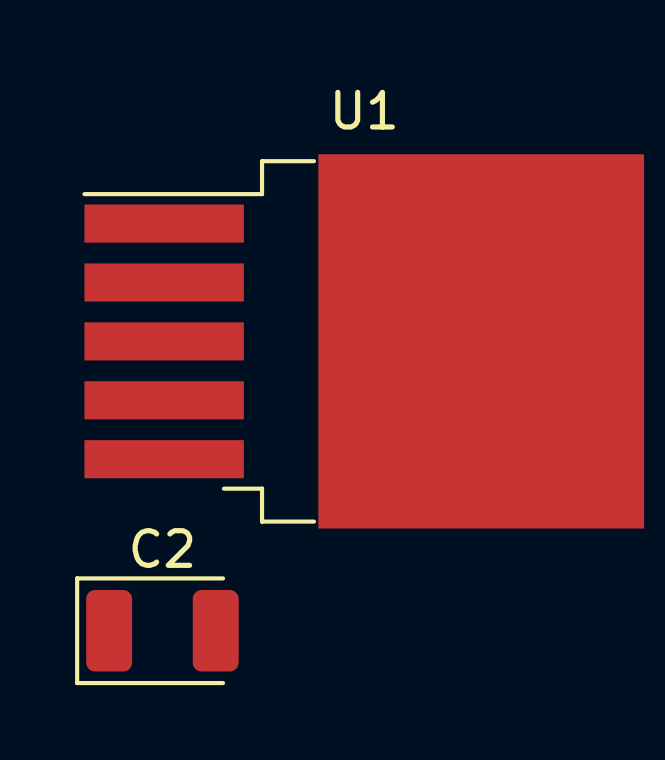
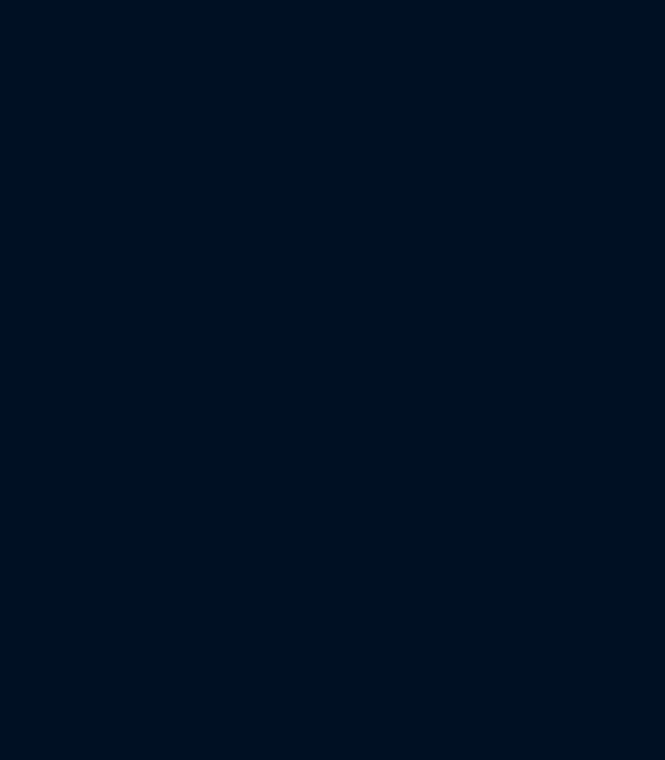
U1: (363, 341) -> none
C2: (156, 630) -> none

